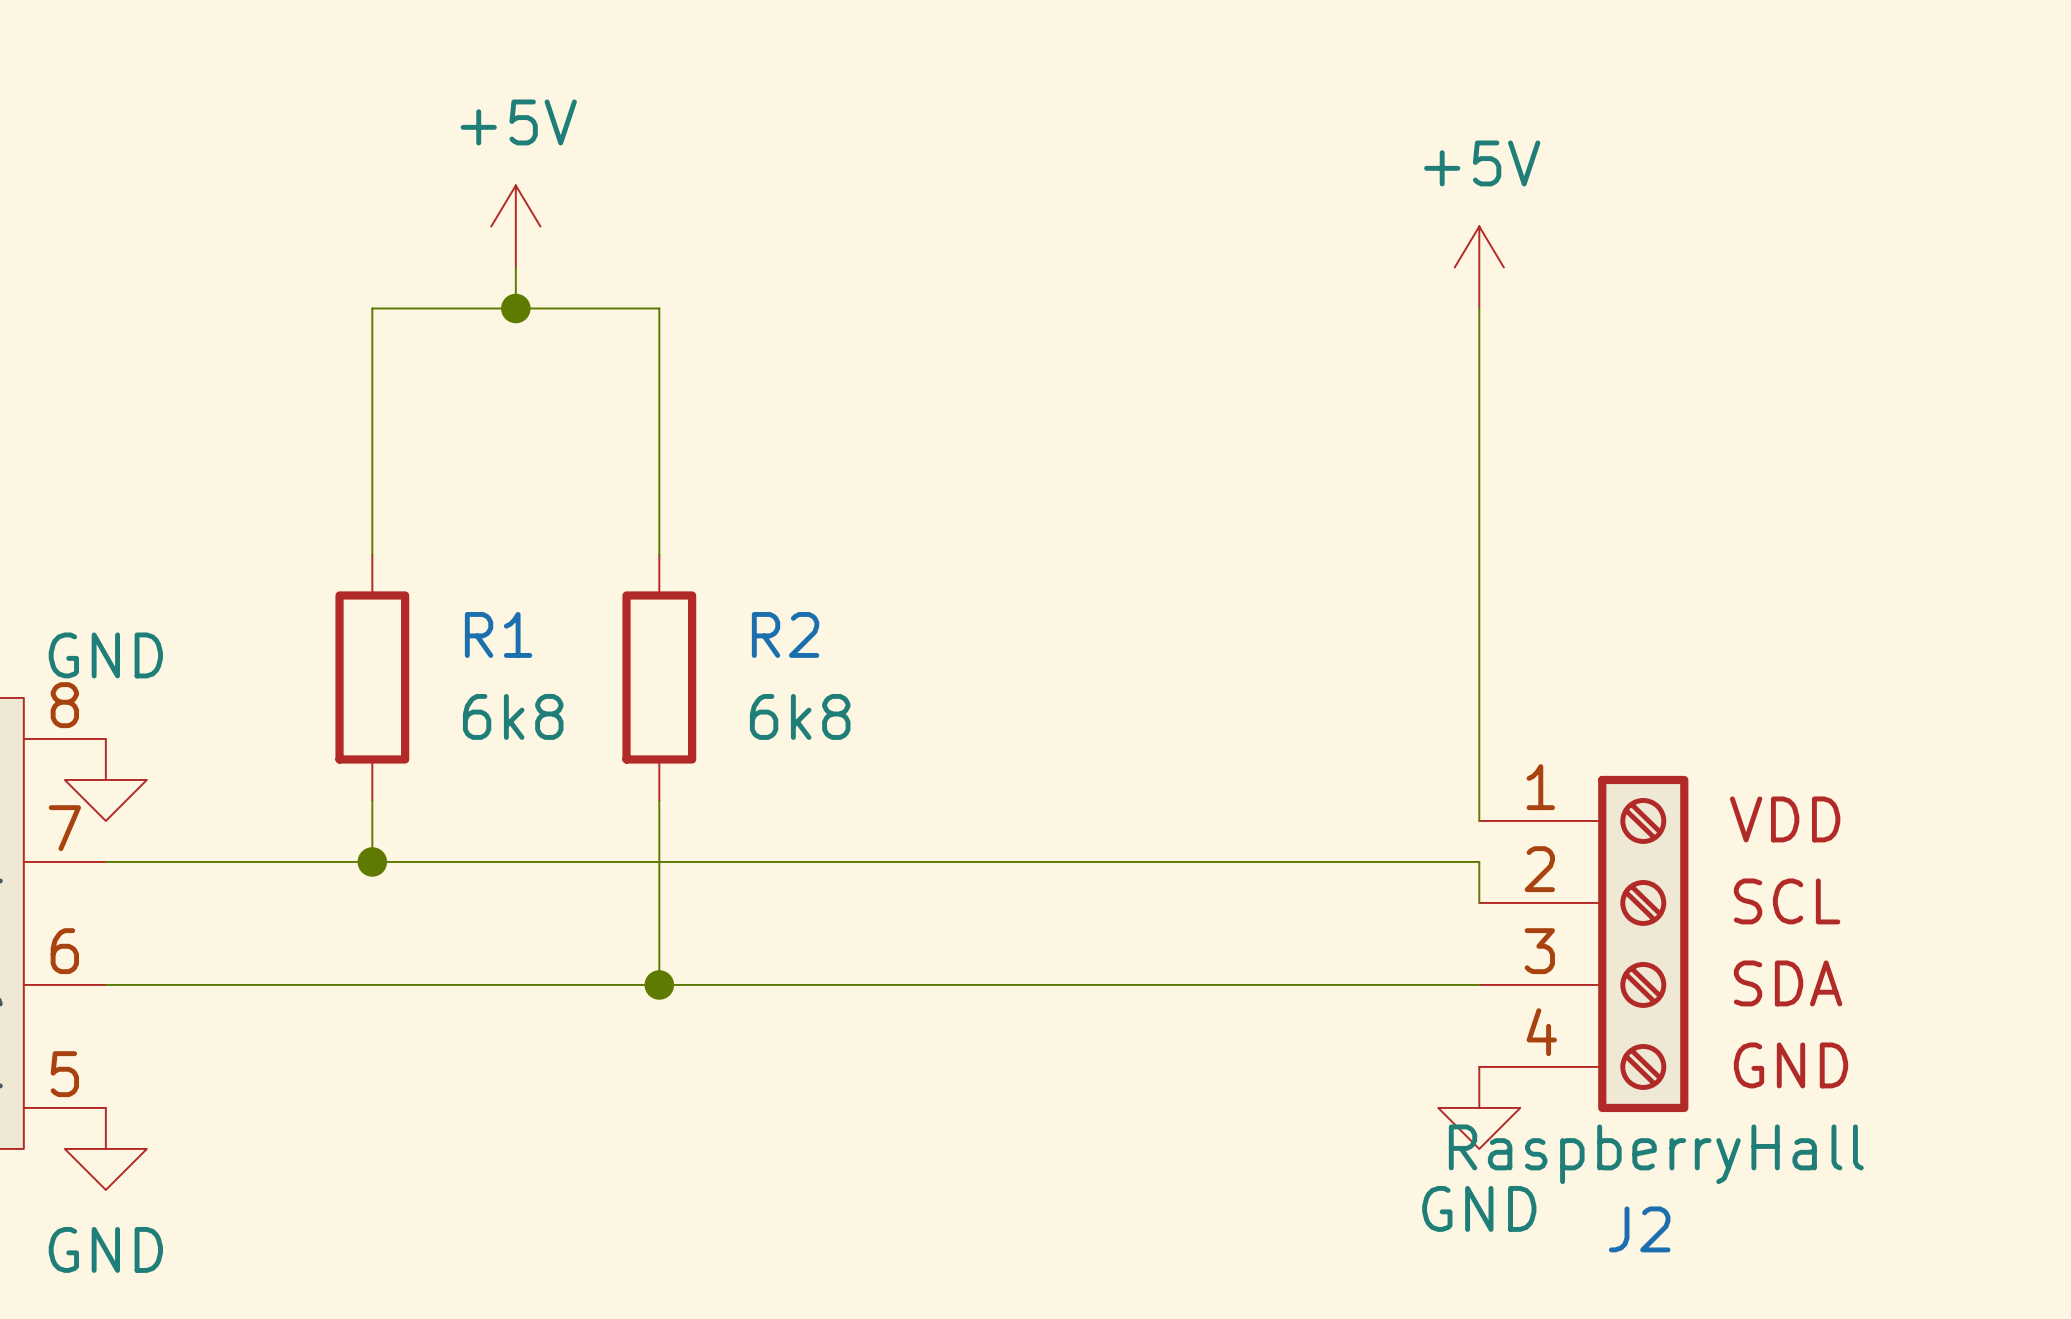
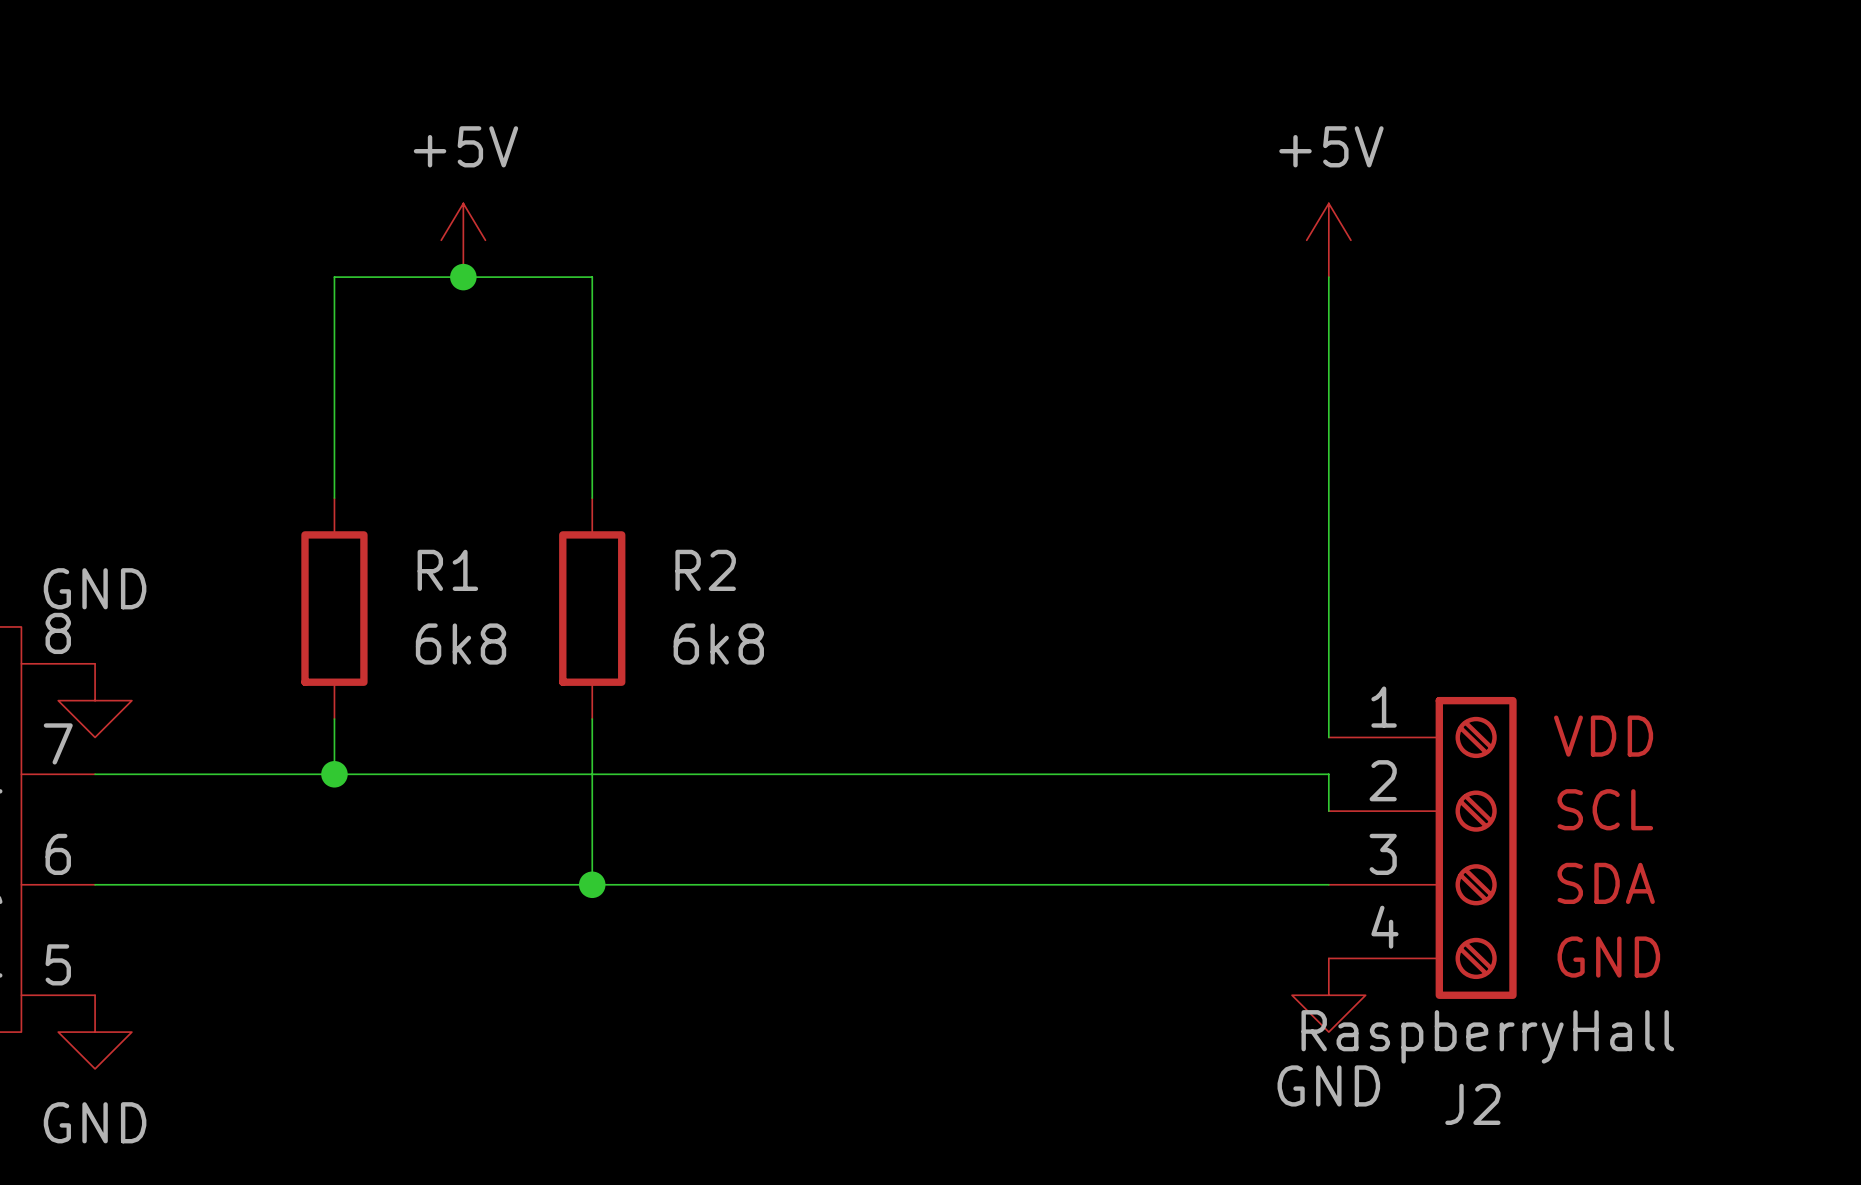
power symbol position: +5V (515, 226) -> +5V (463, 240)

